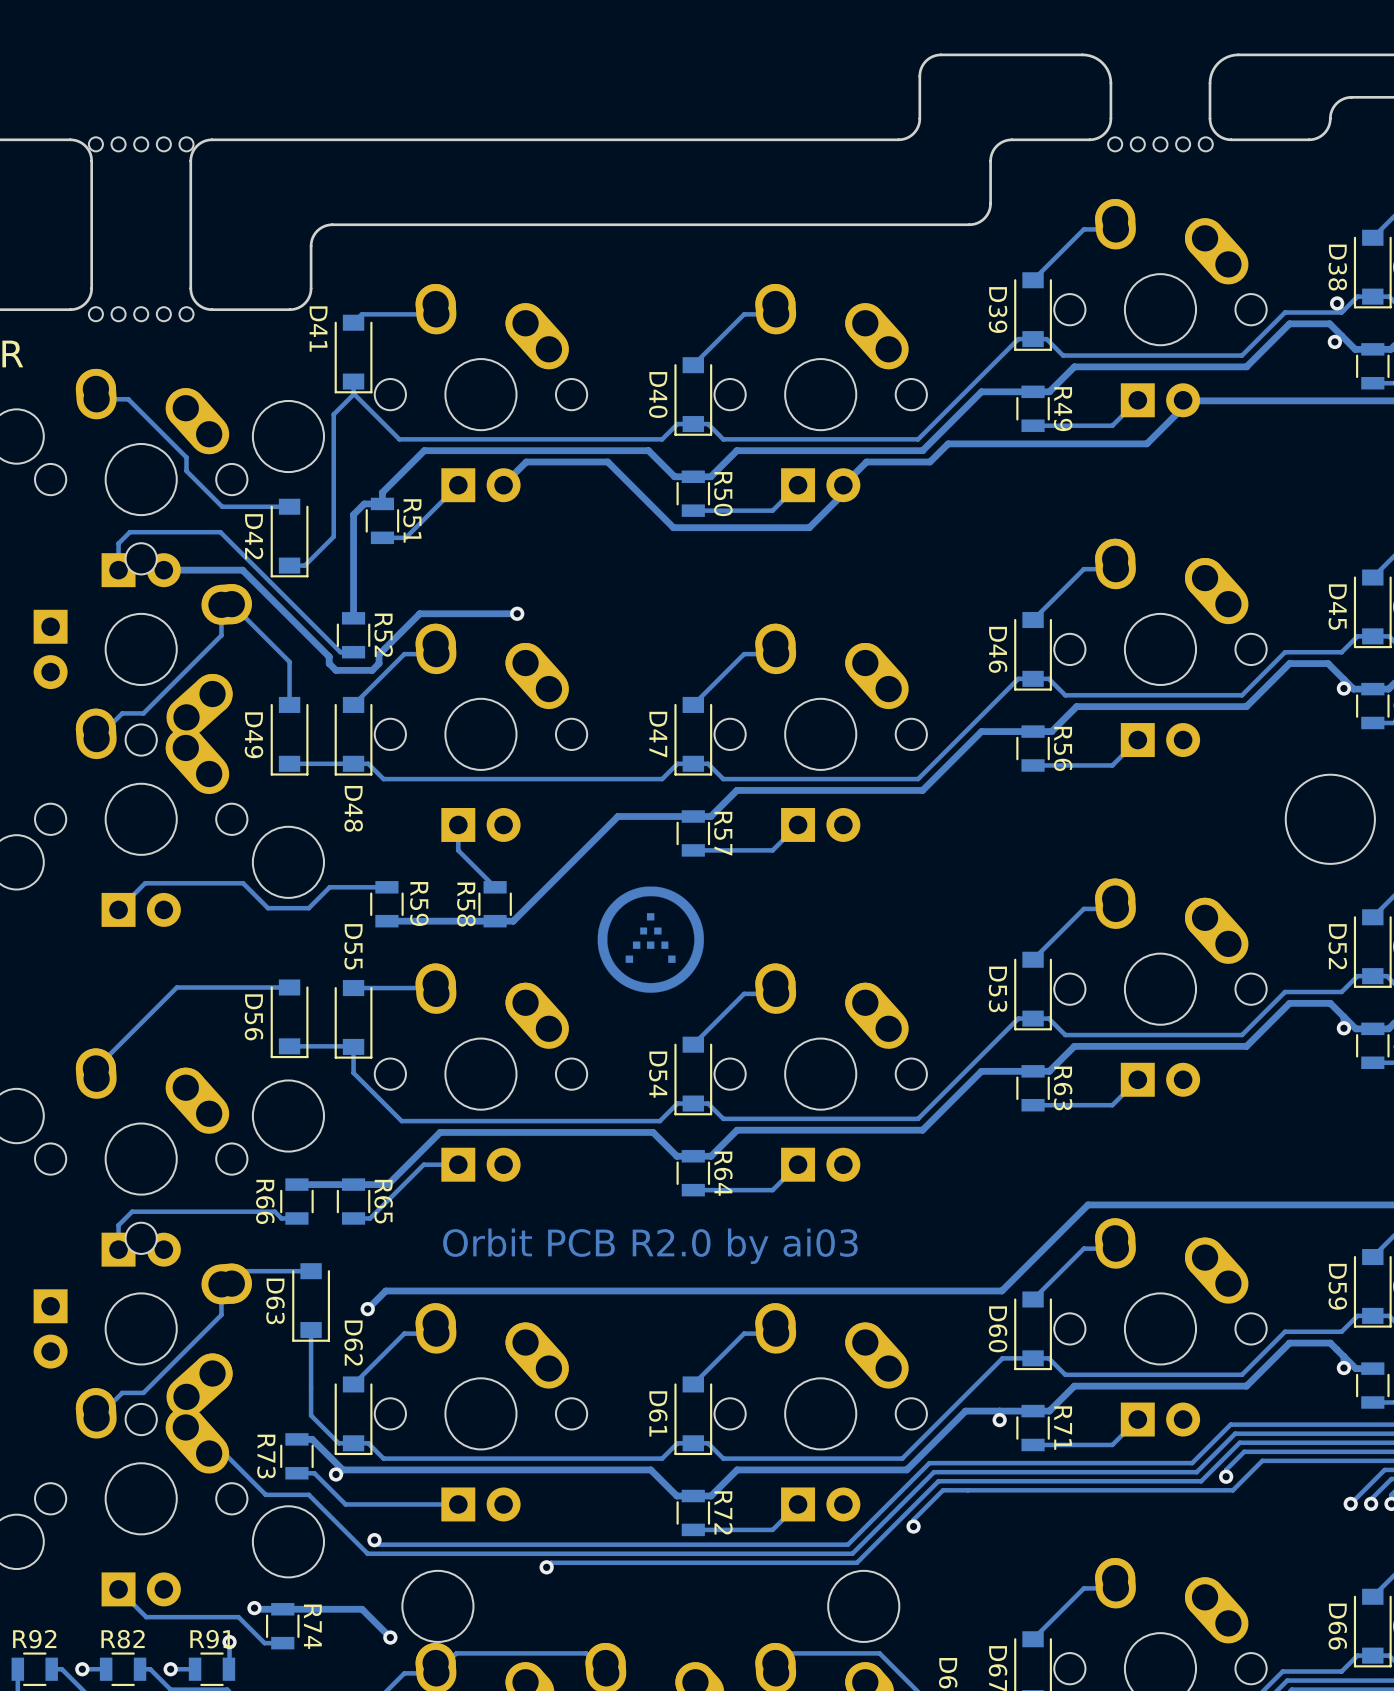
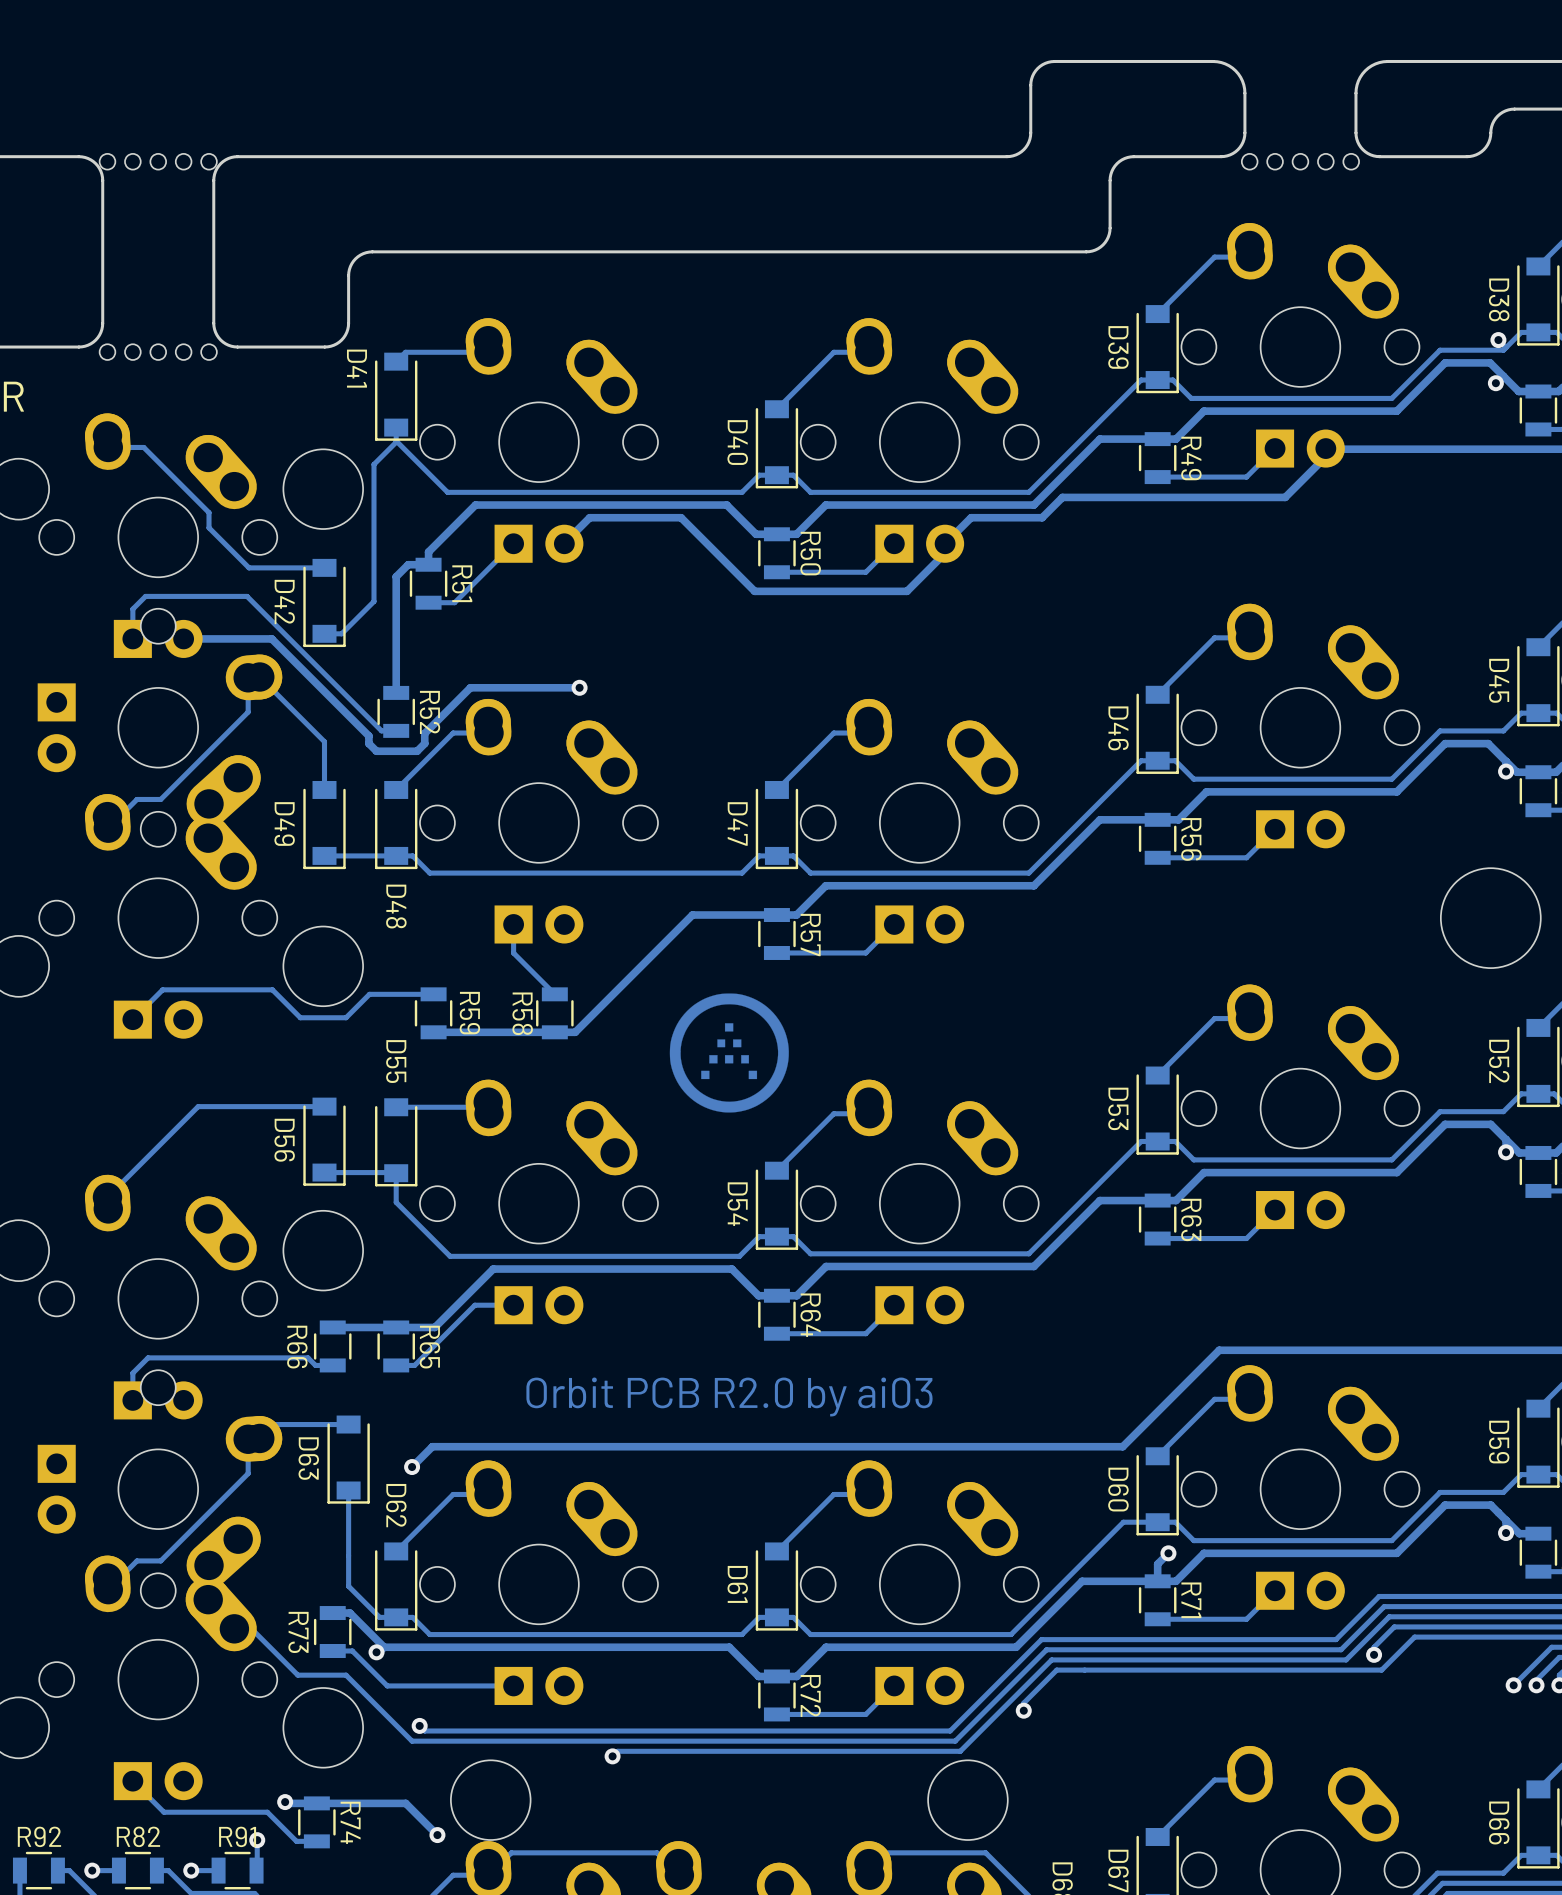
track: none -> (1168, 1553) (1157, 1564) (1157, 1581)
via position: (999, 1420) -> (1168, 1553)

